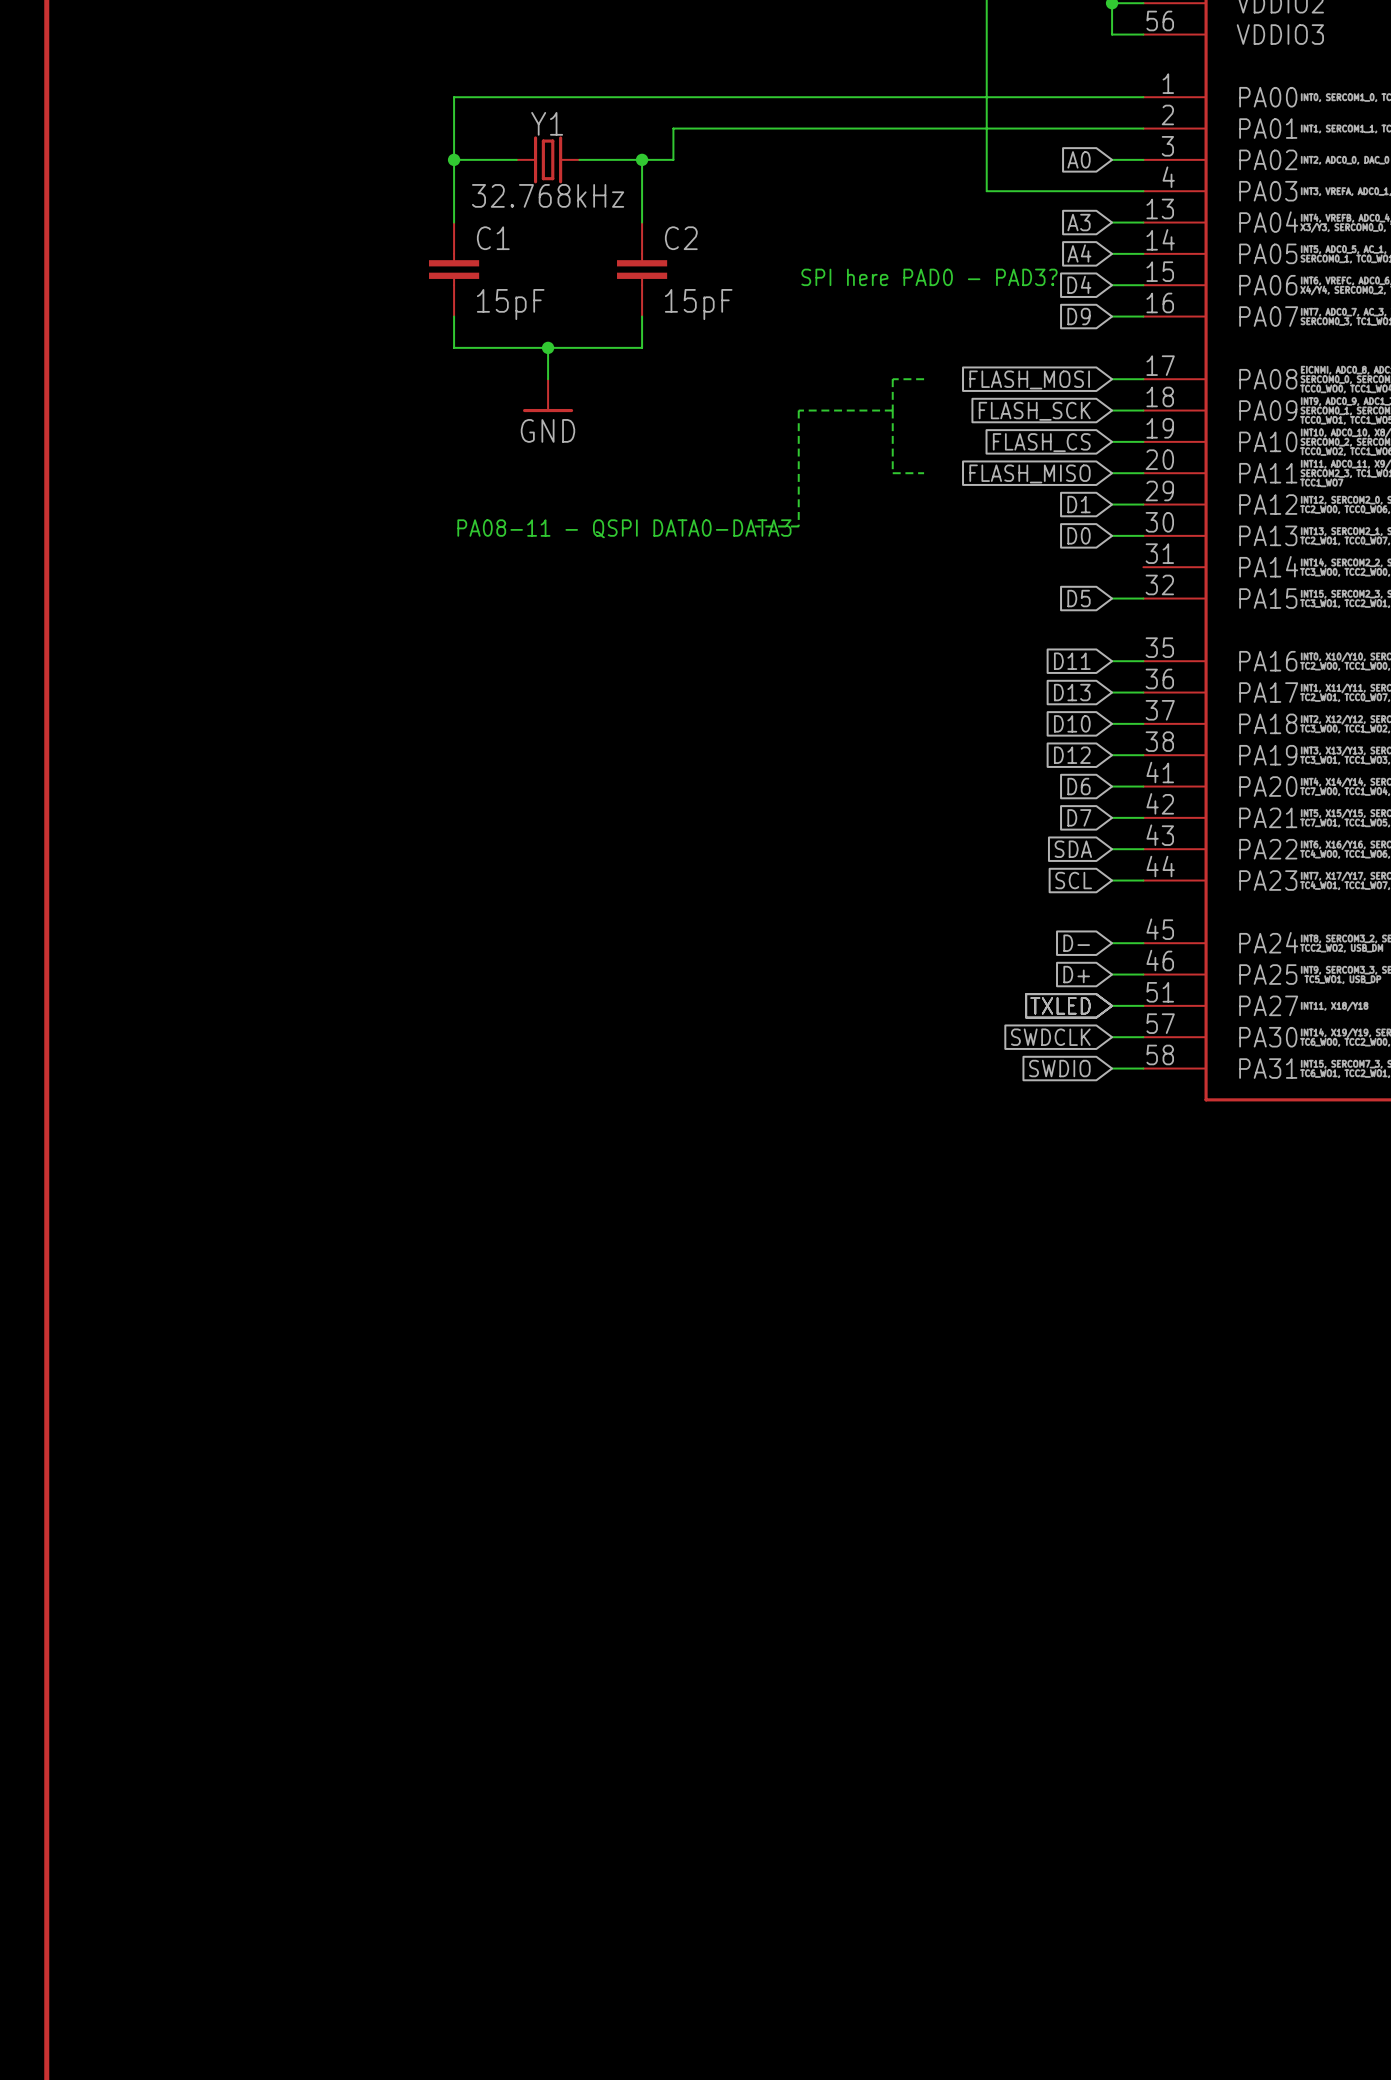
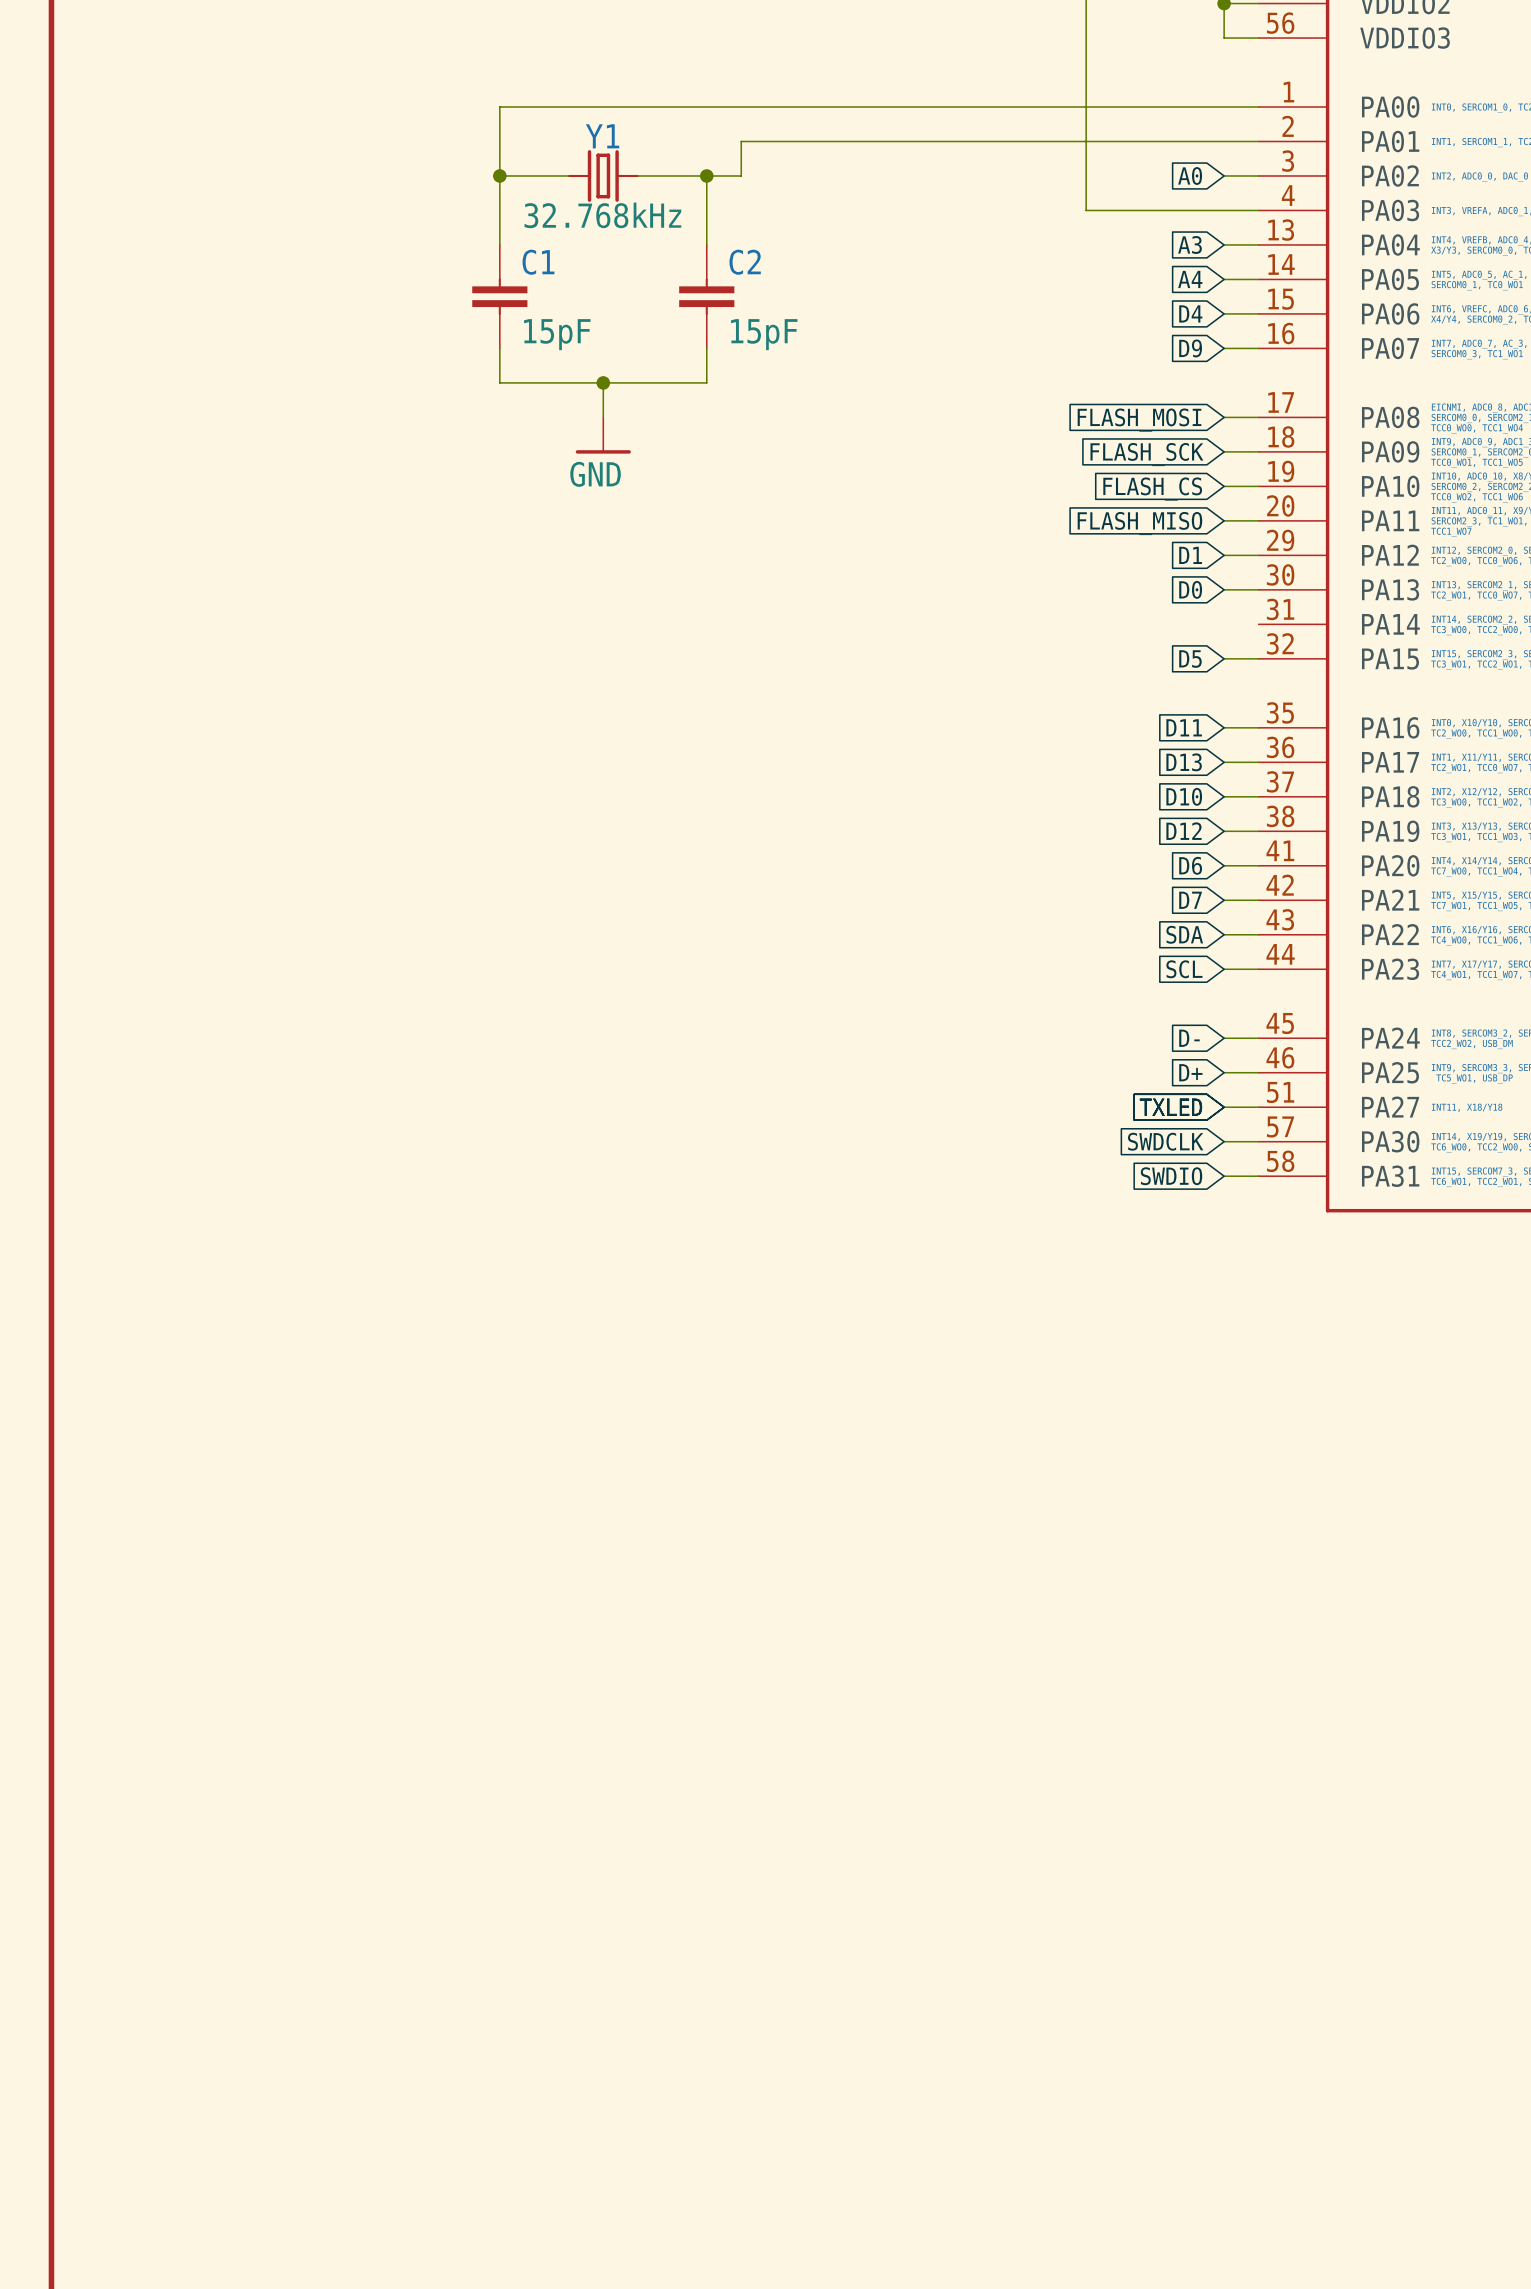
text: SPI here PAD0 - PAD3? (929, 277) -> none
wire: (924, 379) (892, 379) (892, 473) (924, 473) -> none
wire: (892, 410) (798, 410) (798, 526) (754, 526) -> none
text: PA08-11 - QSPI DATA0-DATA3 (624, 528) -> none

